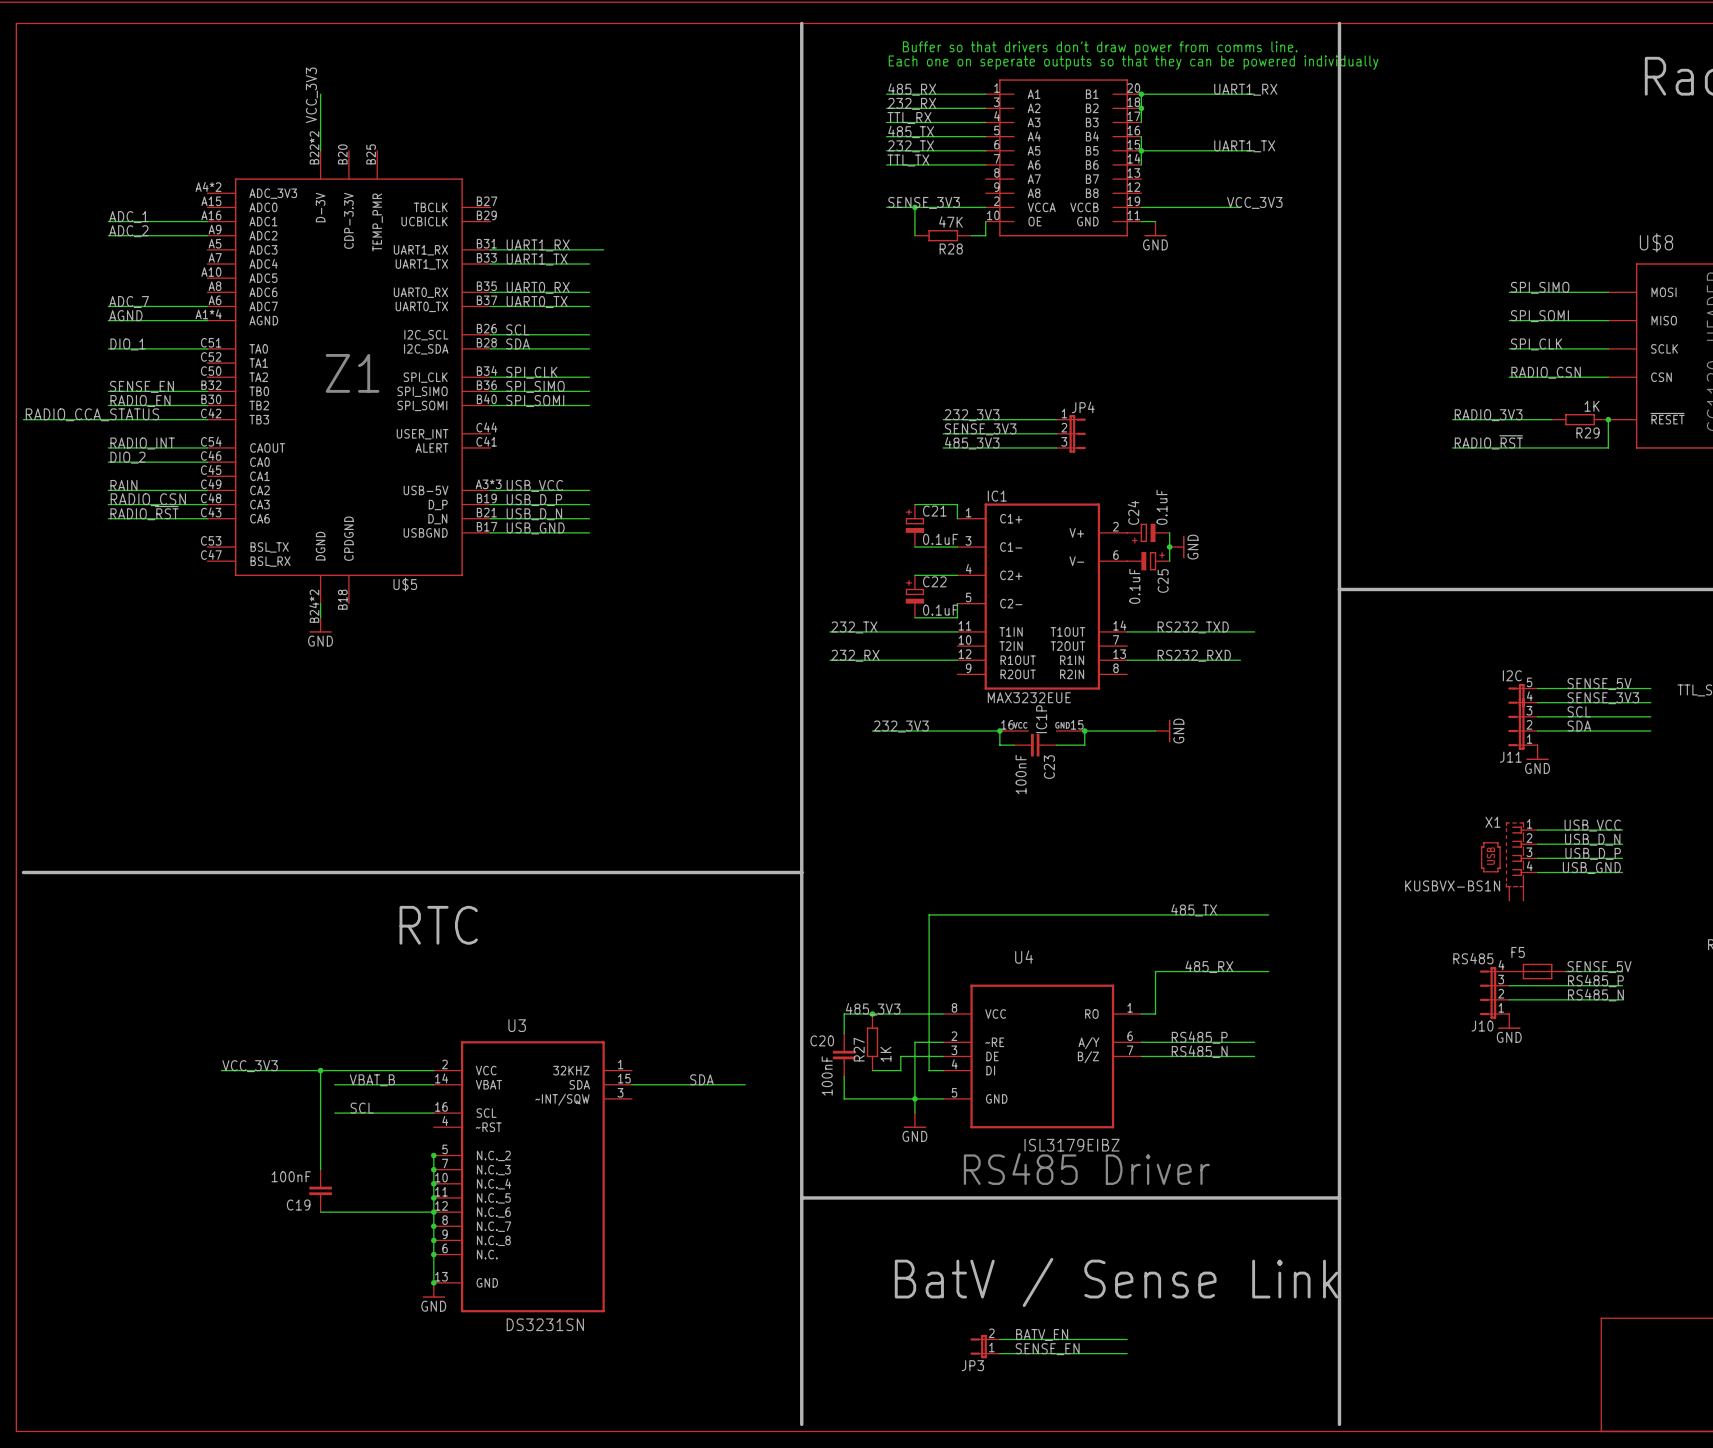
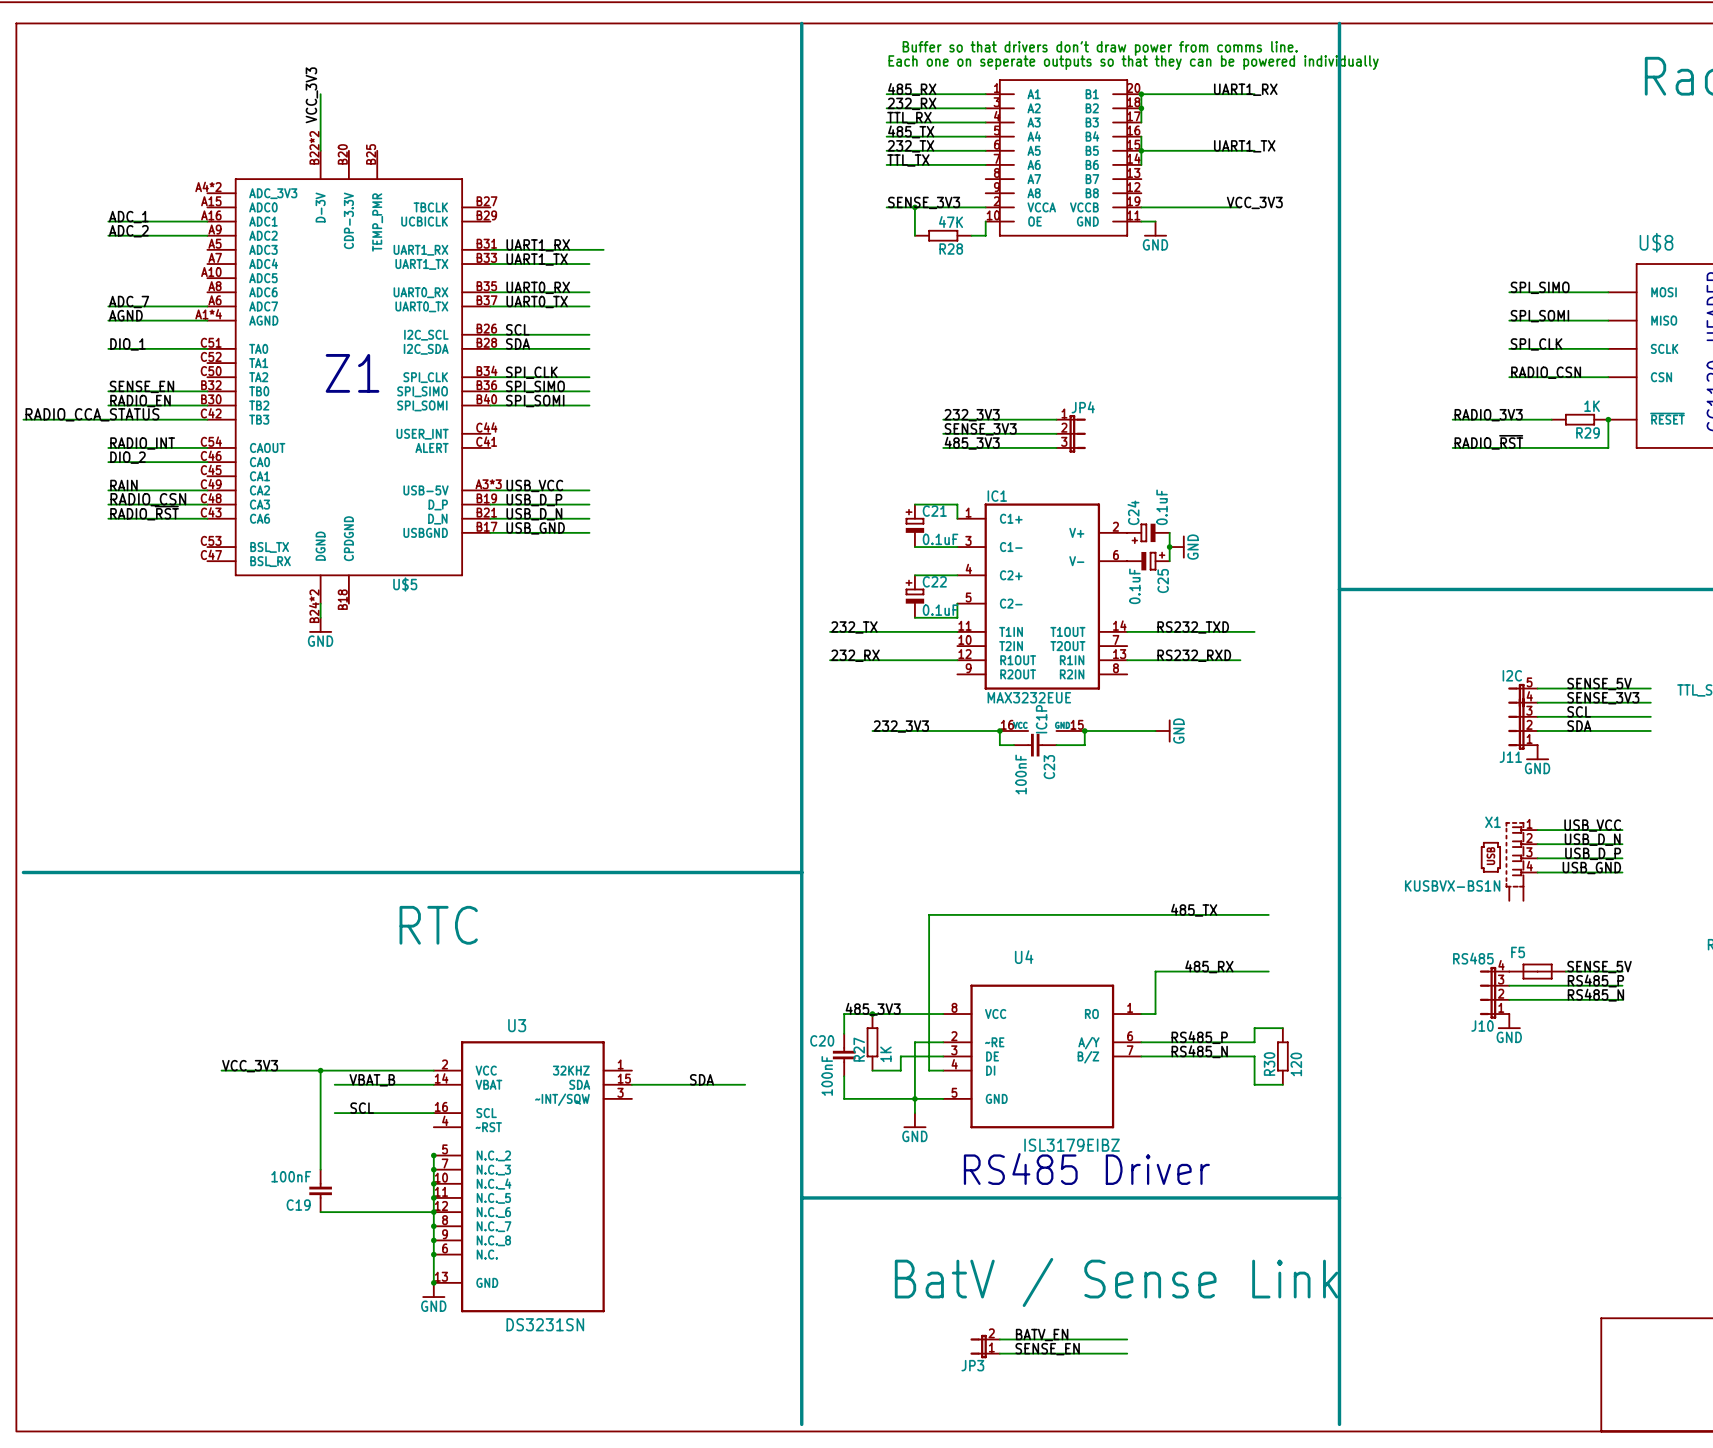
wire: none -> (1282, 1028) (1254, 1028) (1254, 1042)
wire: none -> (1254, 1056) (1254, 1084) (1282, 1084)
R30: none -> 120 (1282, 1056)

